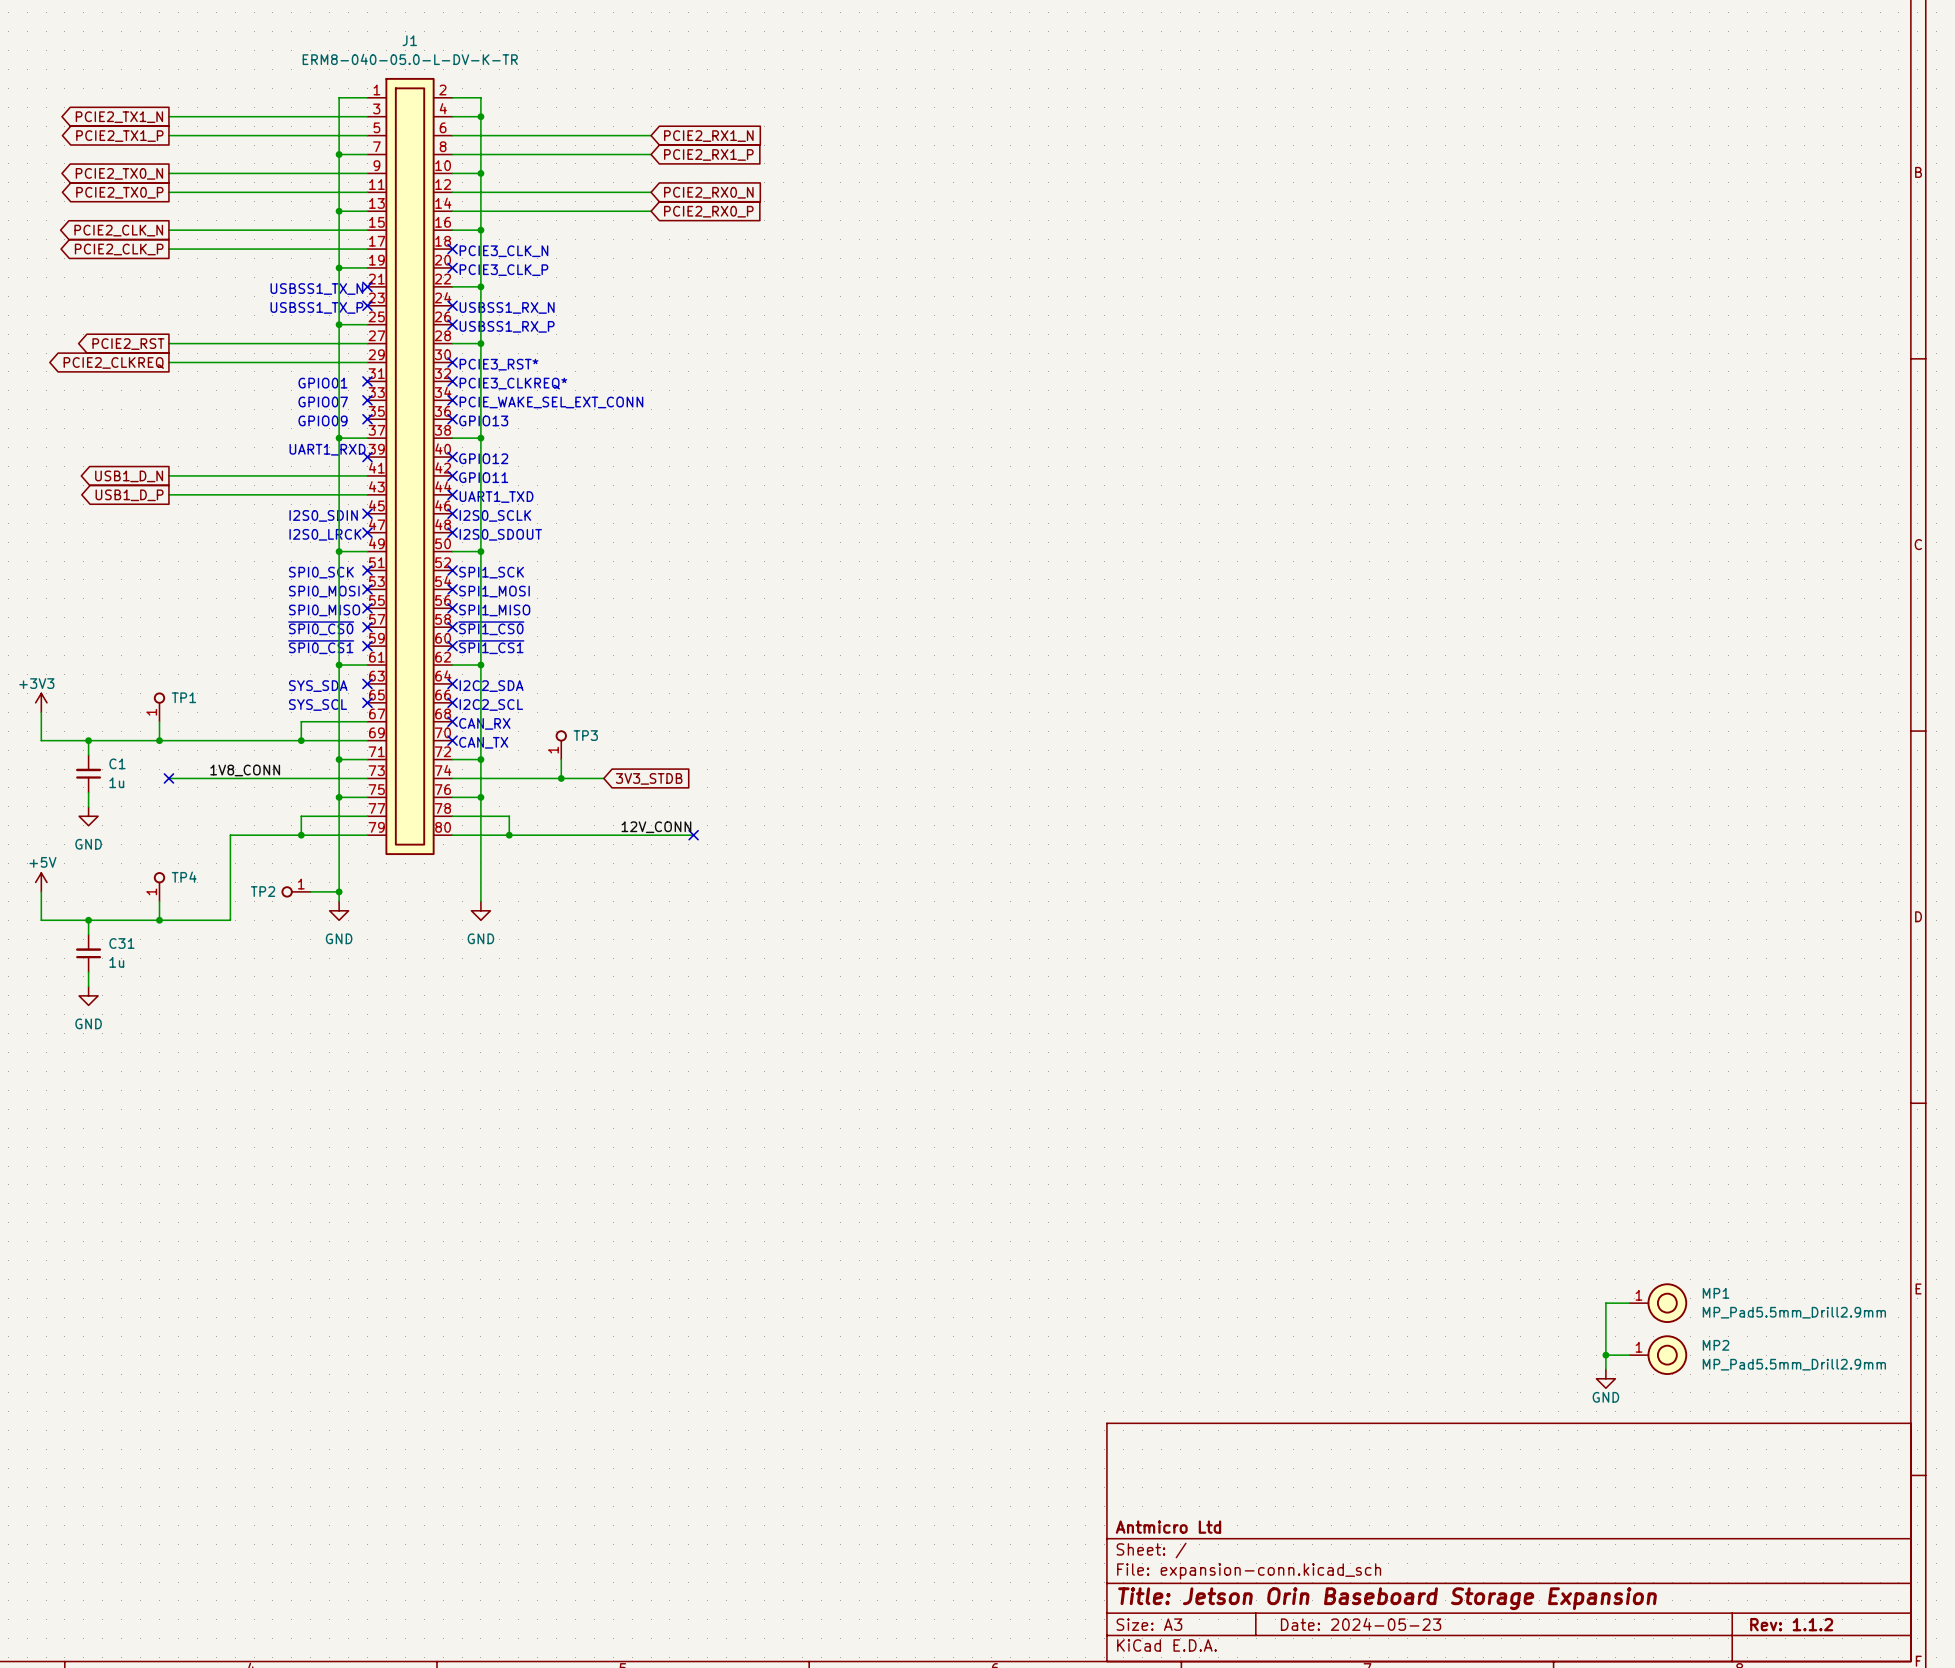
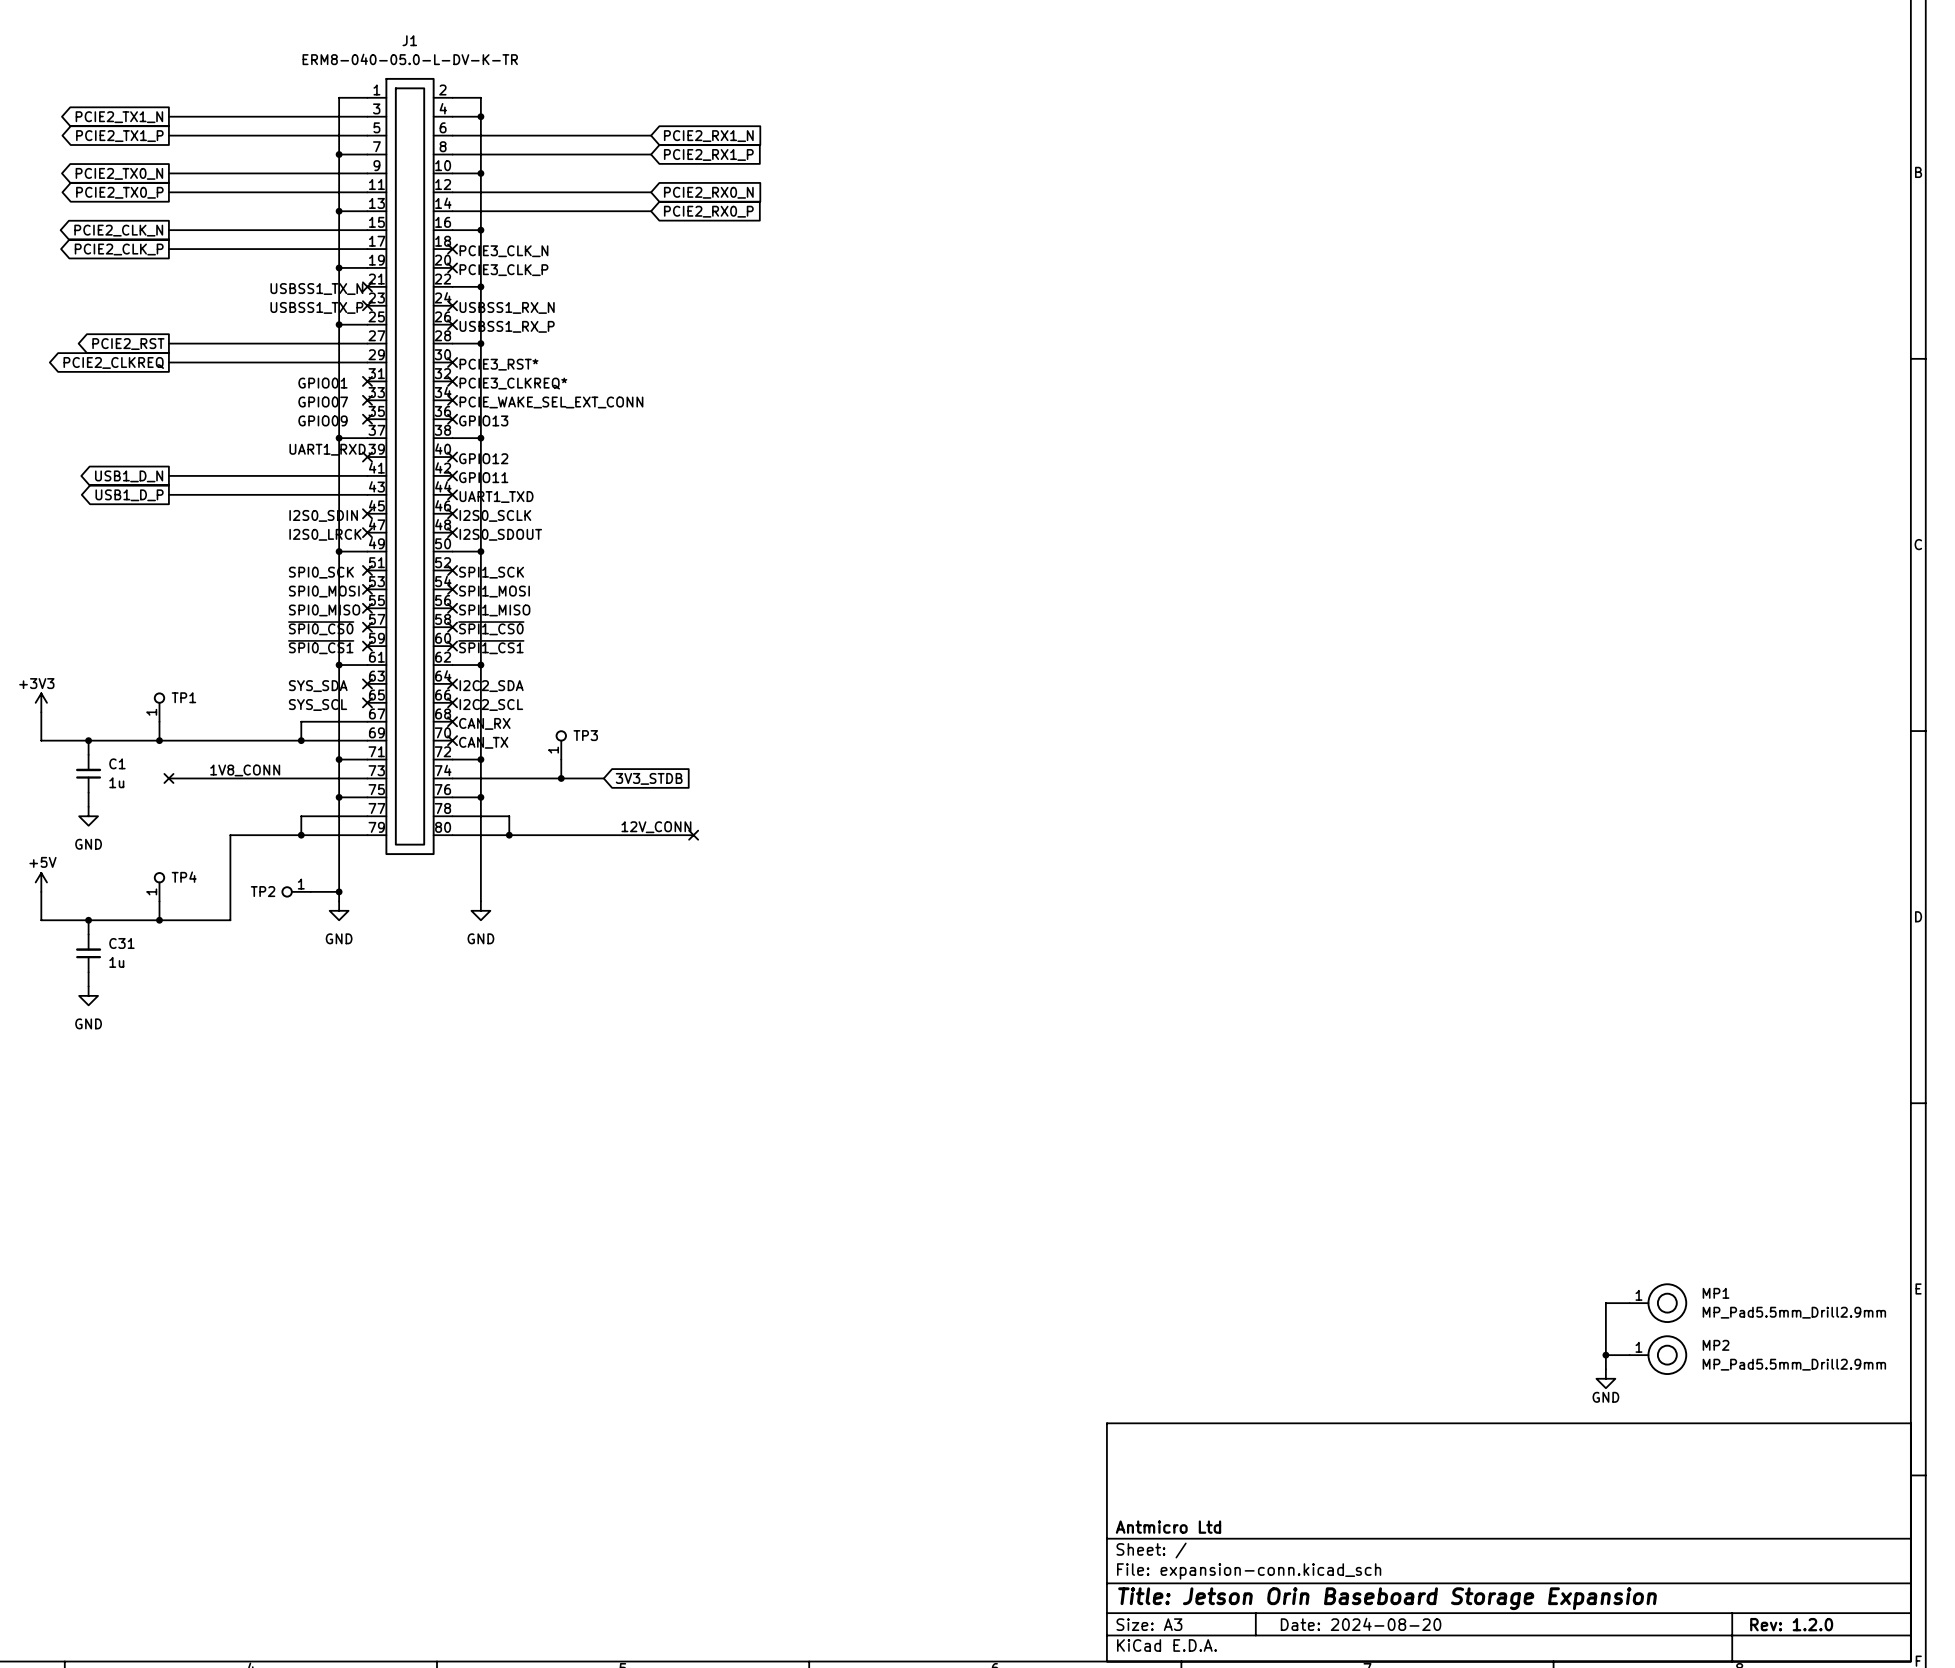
title block: Date: 2024-05-23 (1361, 1624) -> Date: 2024-08-20 (1361, 1624)
title block: Rev: 1.1.2 (1791, 1624) -> Rev: 1.2.0 (1791, 1624)

